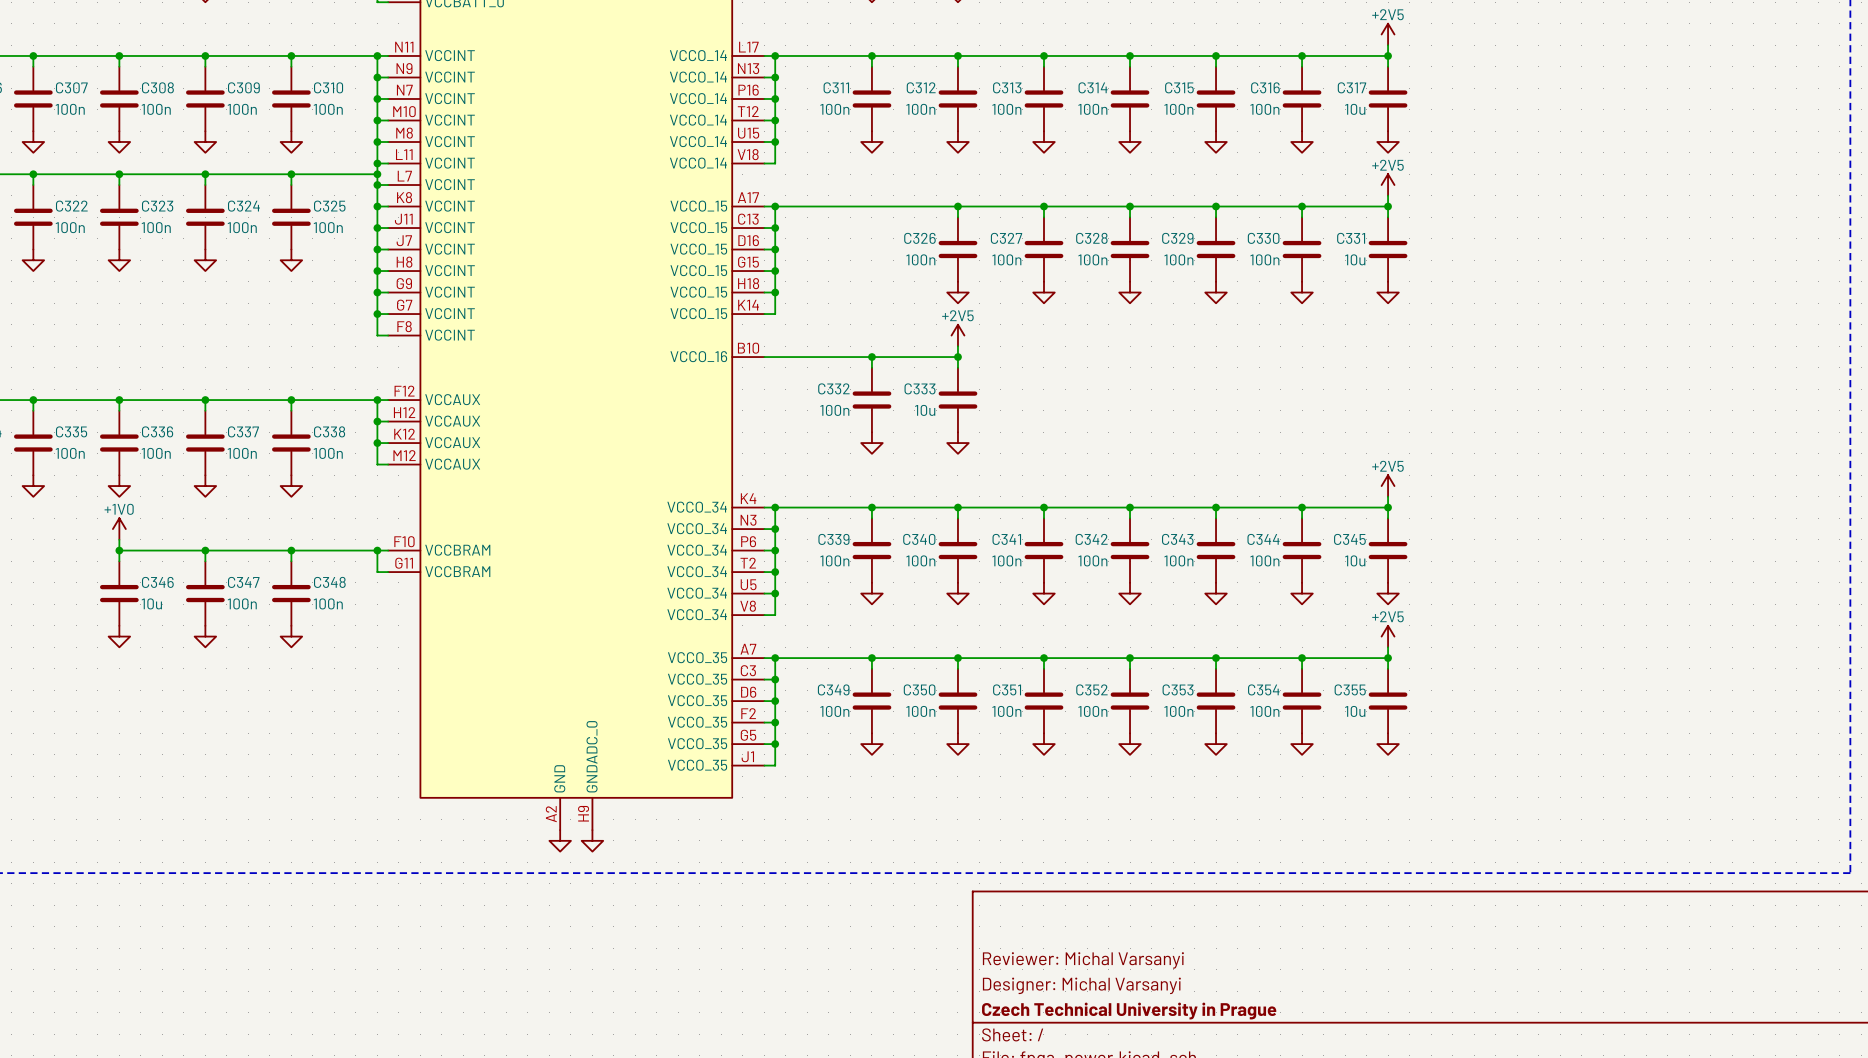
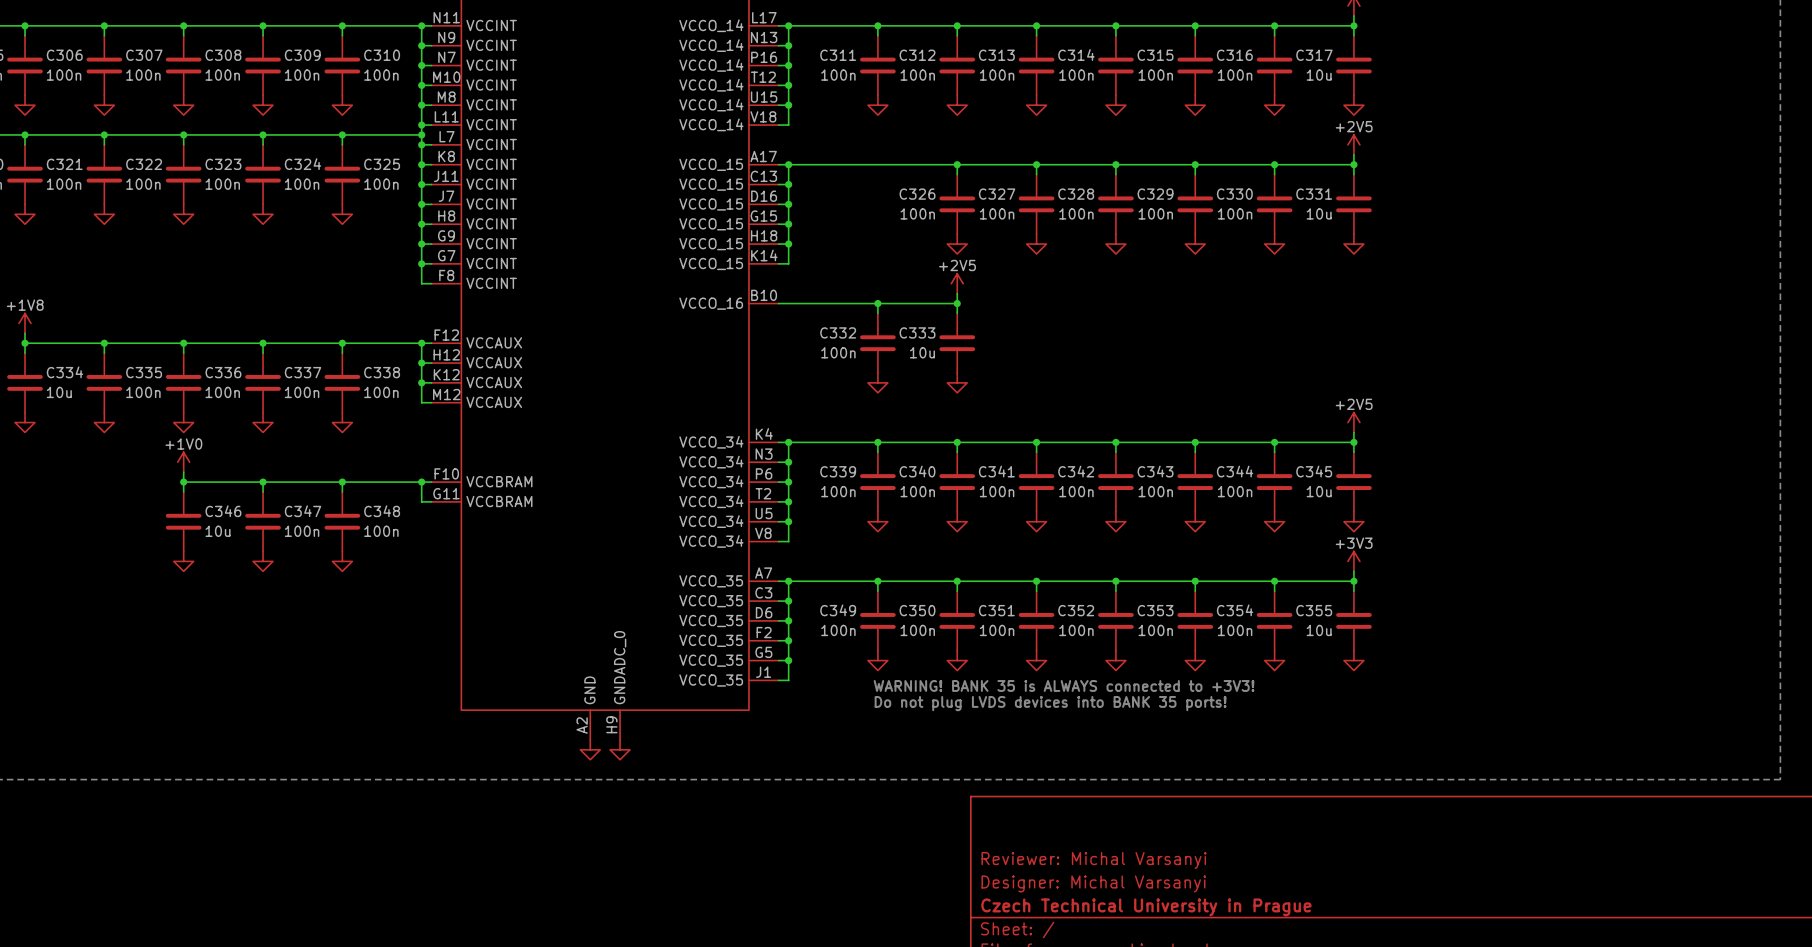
power symbol: +2V5 (1388, 636) -> +3V3 (1353, 561)
text: none -> WARNING! BANK 35 is ALWAYS connected to +3V3! (1064, 685)
text: none -> Do not plug LVDS devices into BANK 35 ports! (1050, 703)

